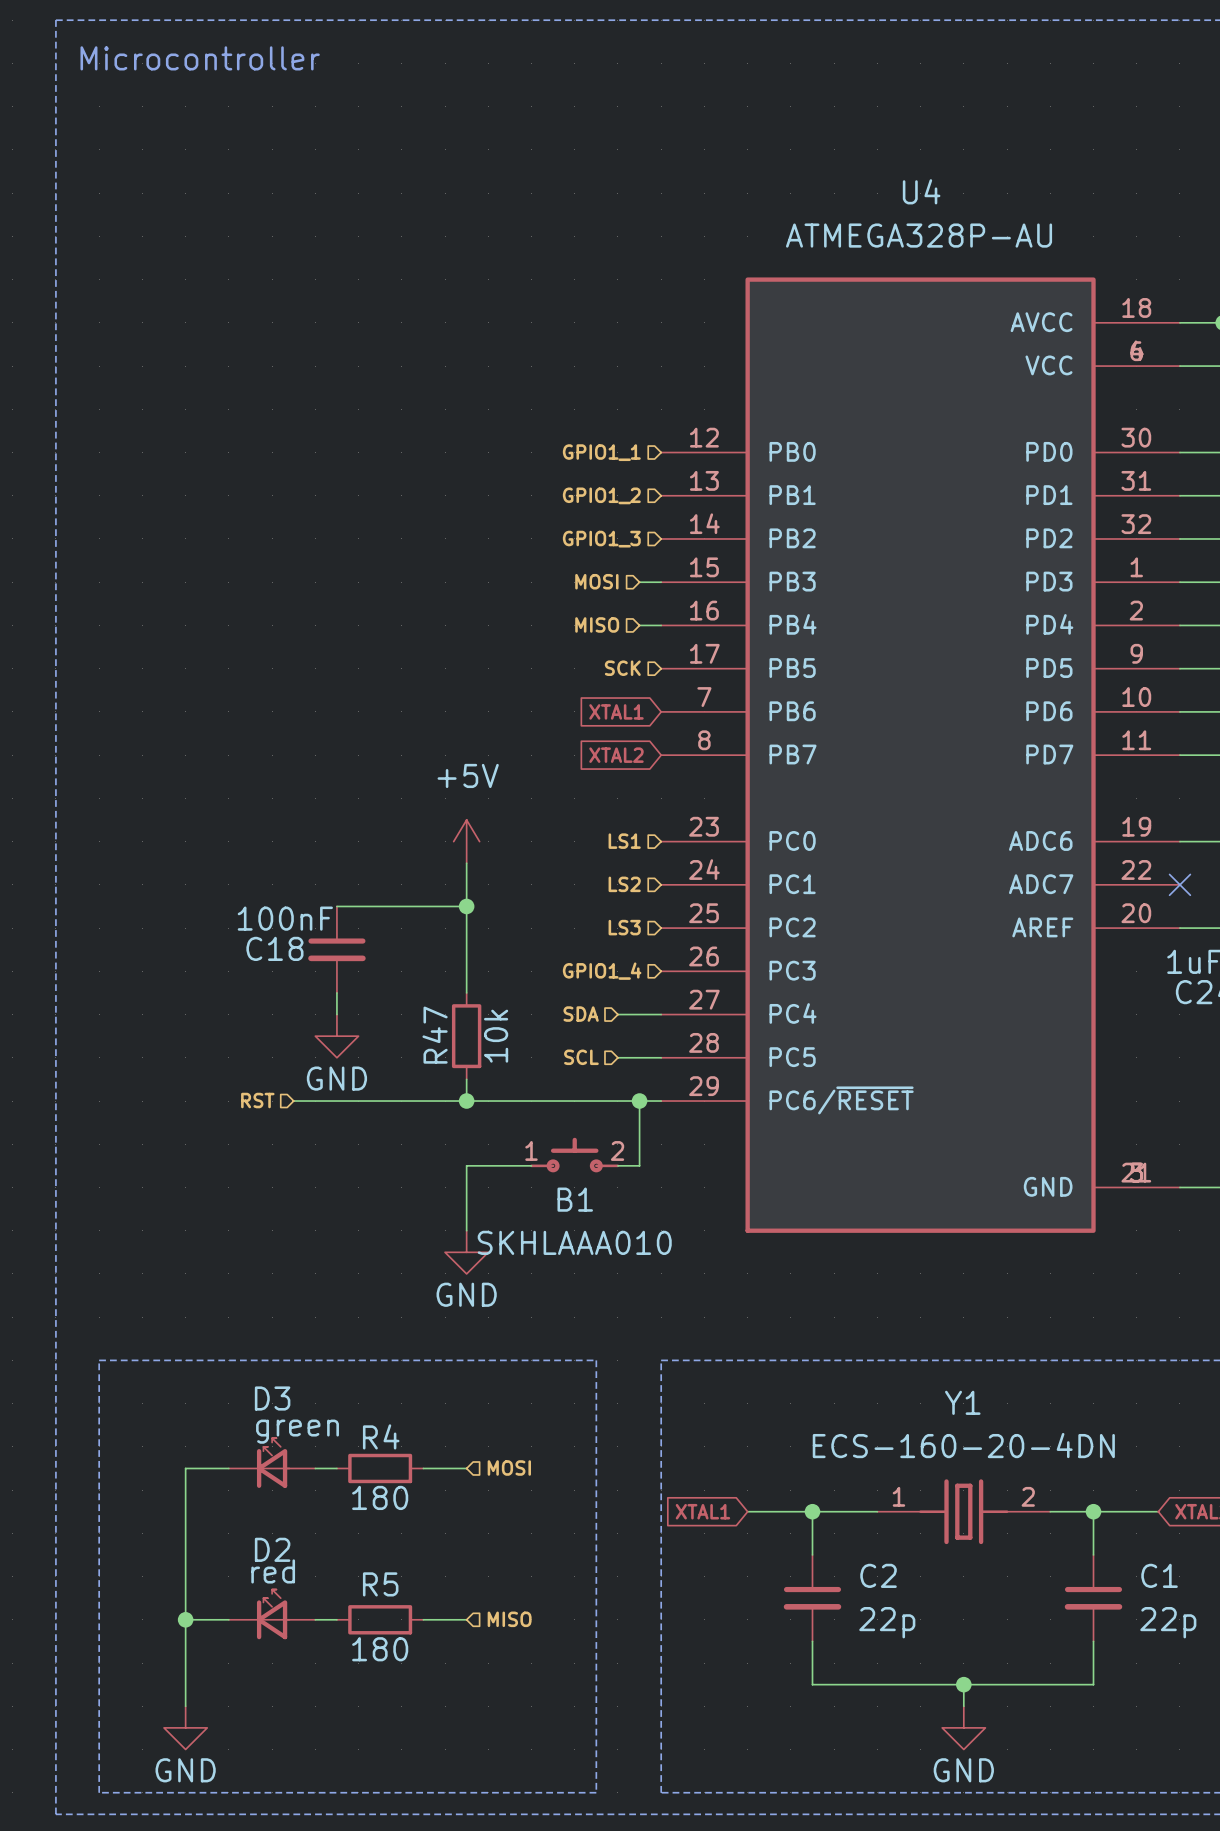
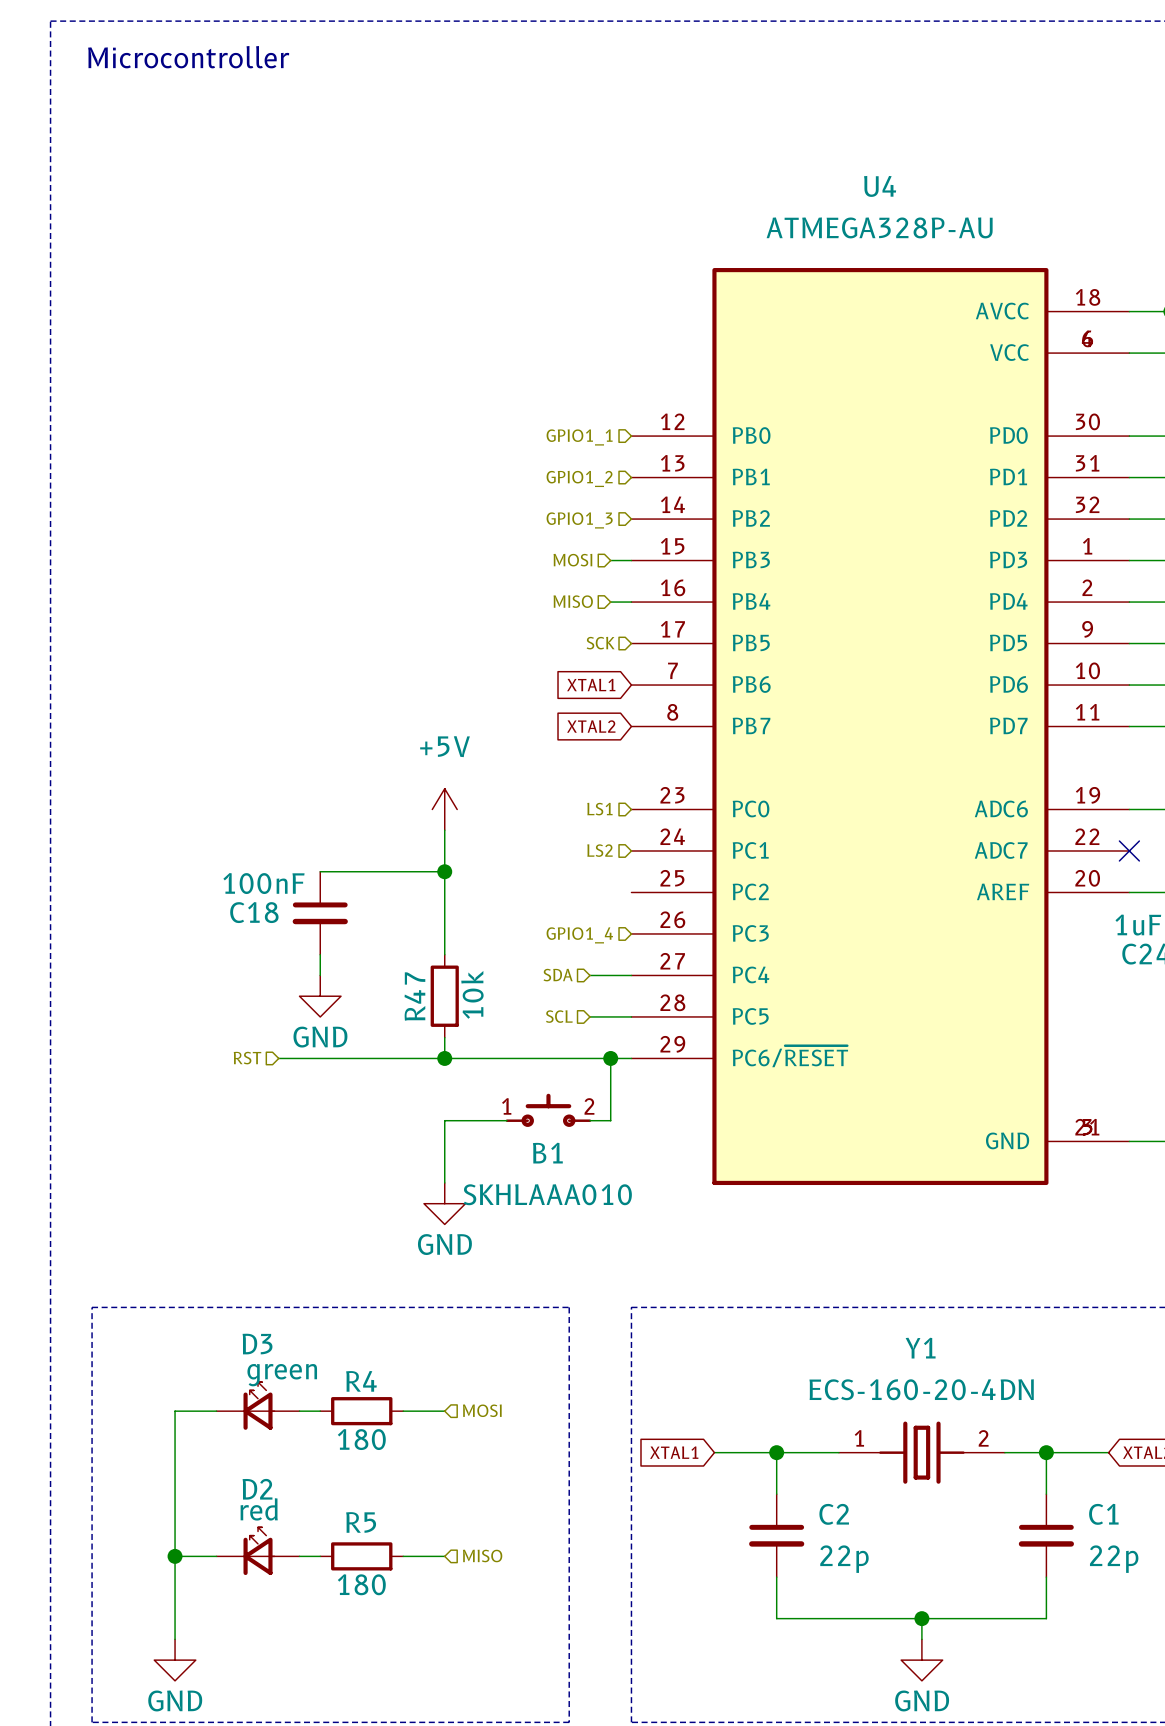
hierarchical label: LS3 (624, 927) -> none

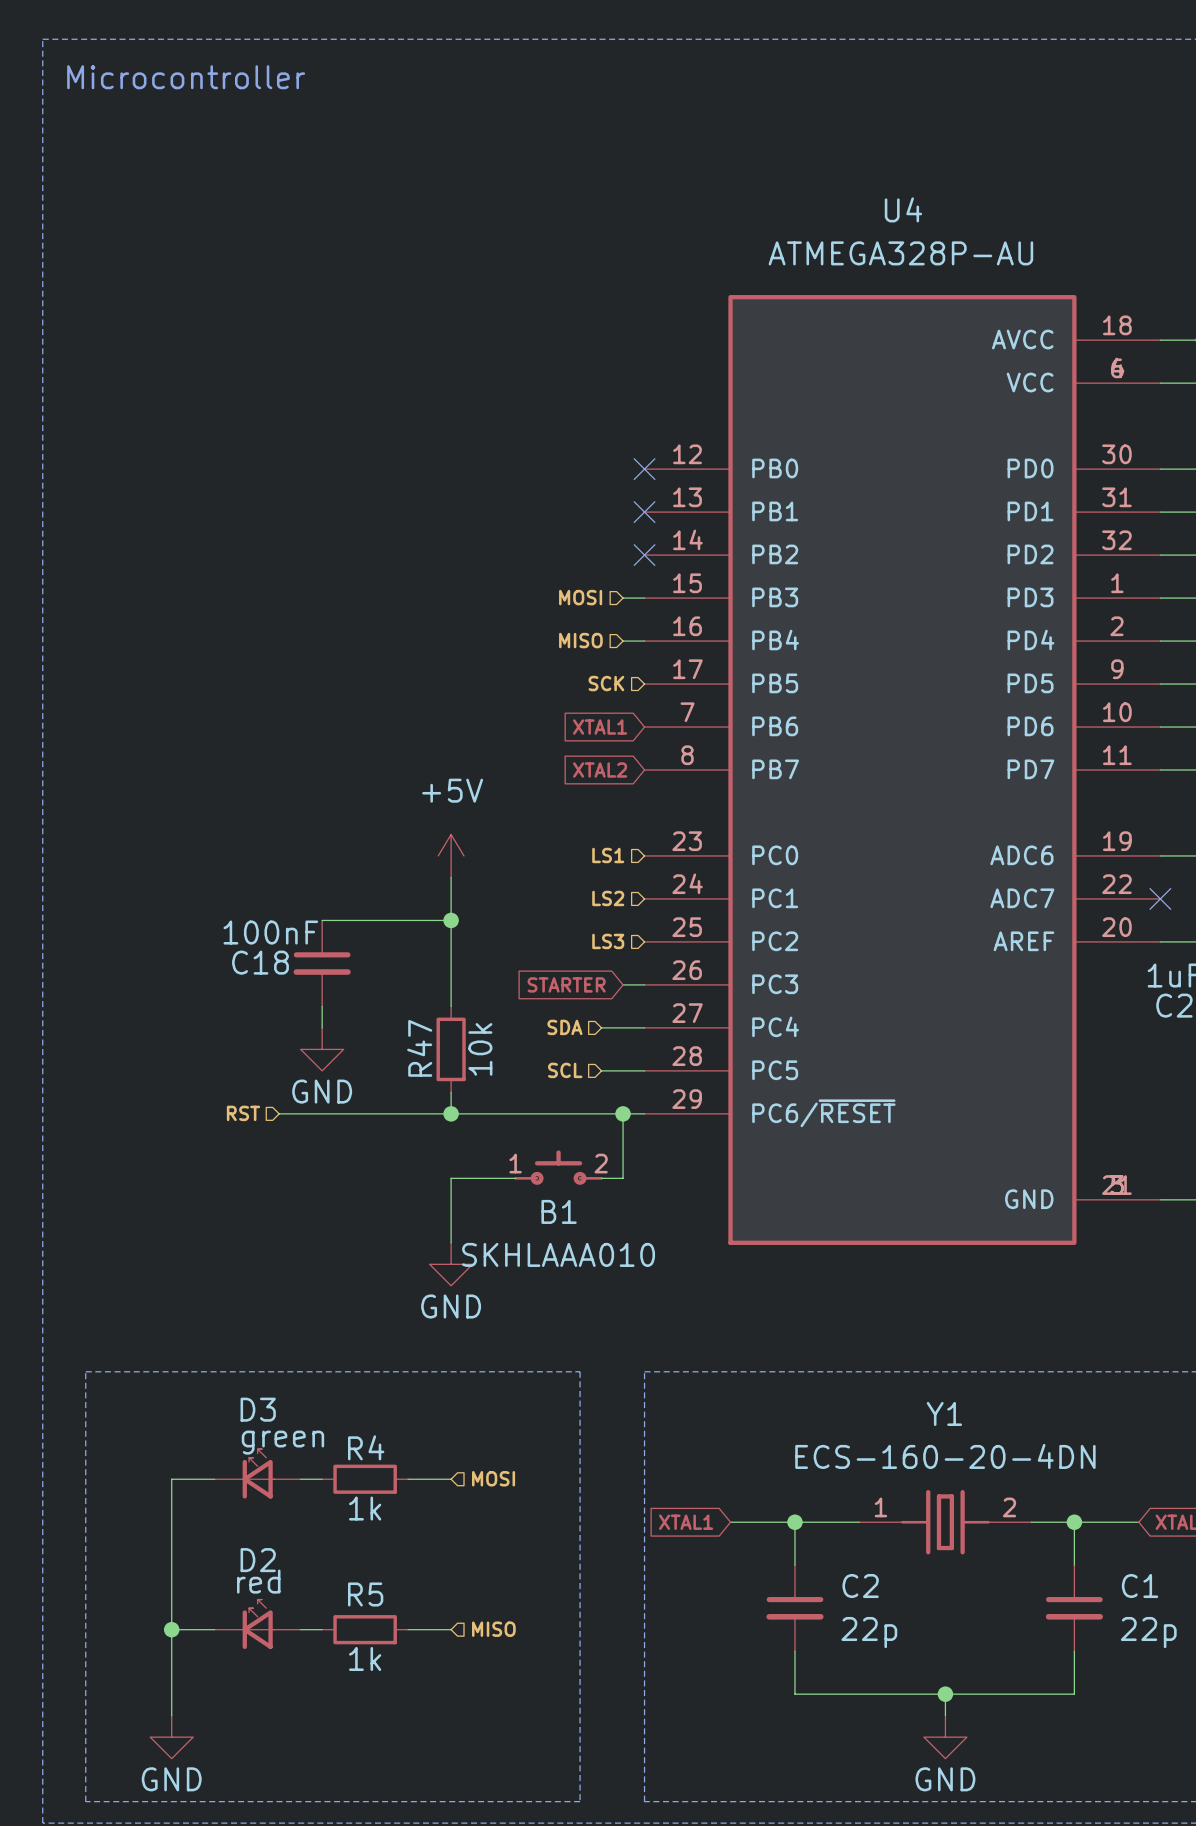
no-connect mark: none -> (644, 469)
hierarchical label: GPIO1_1 (579, 437) -> none
no-connect mark: none -> (644, 512)
hierarchical label: GPIO1_2 (579, 478) -> none
no-connect mark: none -> (644, 555)
hierarchical label: GPIO1_3 (579, 520) -> none
hierarchical label: none -> LS3 (608, 941)
wire: none -> (623, 984) (644, 984)
global label: none -> STARTER (566, 984)
hierarchical label: GPIO1_4 (579, 935) -> none
R4 value: 180 (361, 1439) -> 1k (365, 1508)
R5 value: 180 (361, 1584) -> 1k (365, 1658)

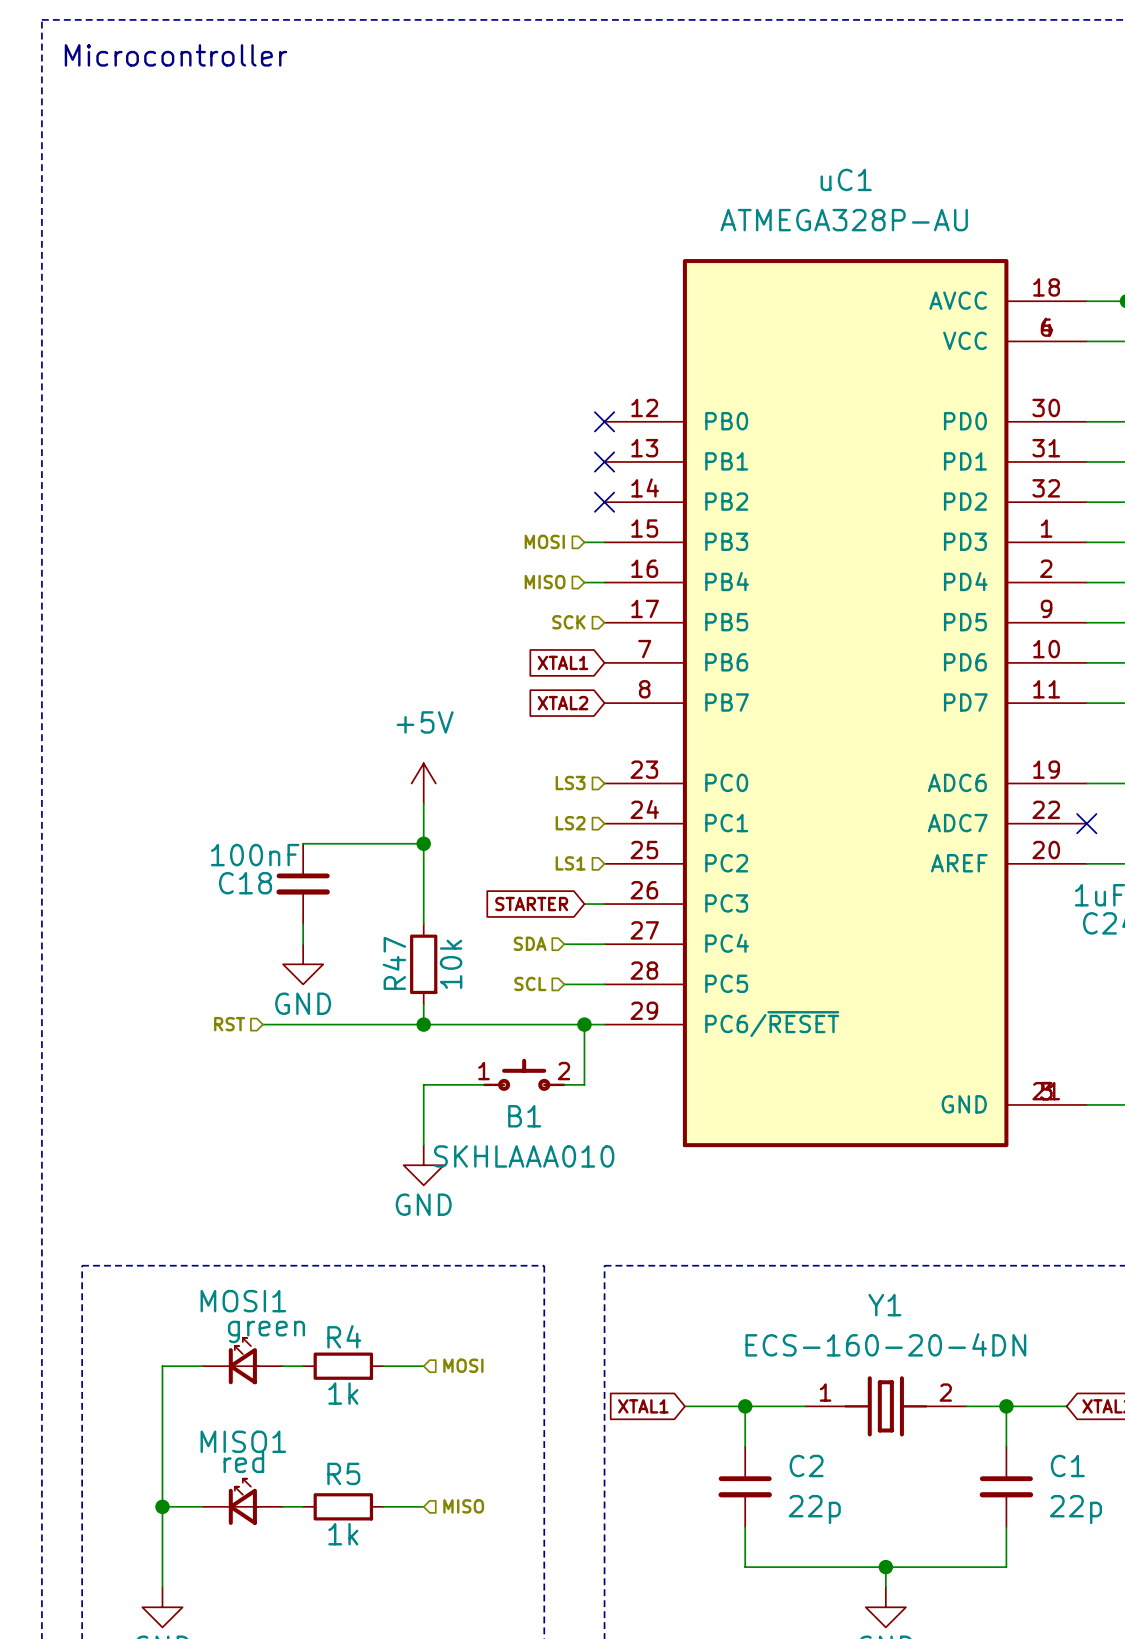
U4 name: U4 (903, 209) -> uC1 (846, 179)
hierarchical label: LS1 (608, 855) -> LS3 (570, 783)
hierarchical label: LS3 (608, 941) -> LS1 (570, 863)
D3 name: D3 (258, 1409) -> MOSI1 (243, 1301)
D2 name: D2 (258, 1560) -> MISO1 (243, 1441)

